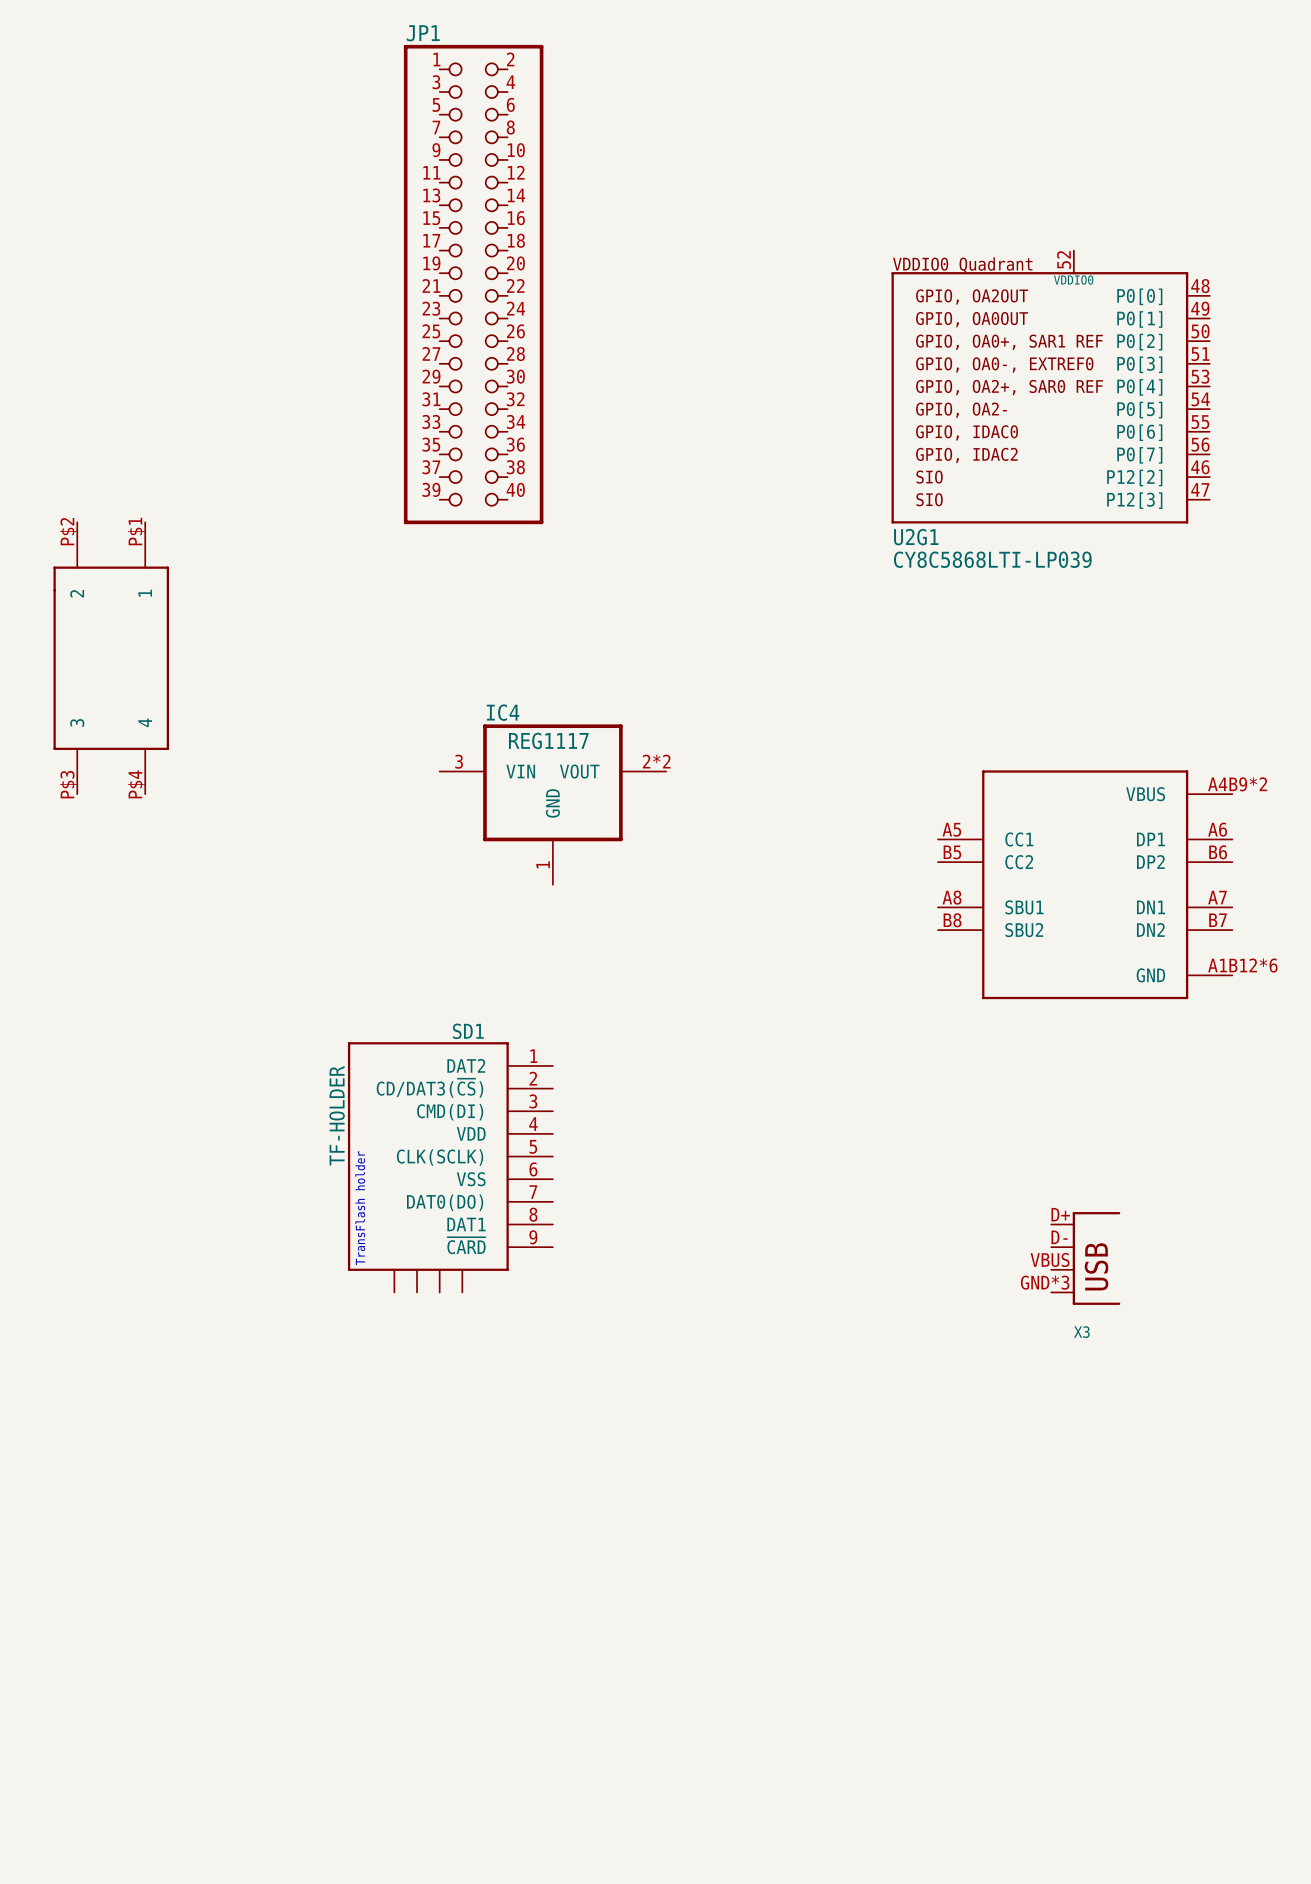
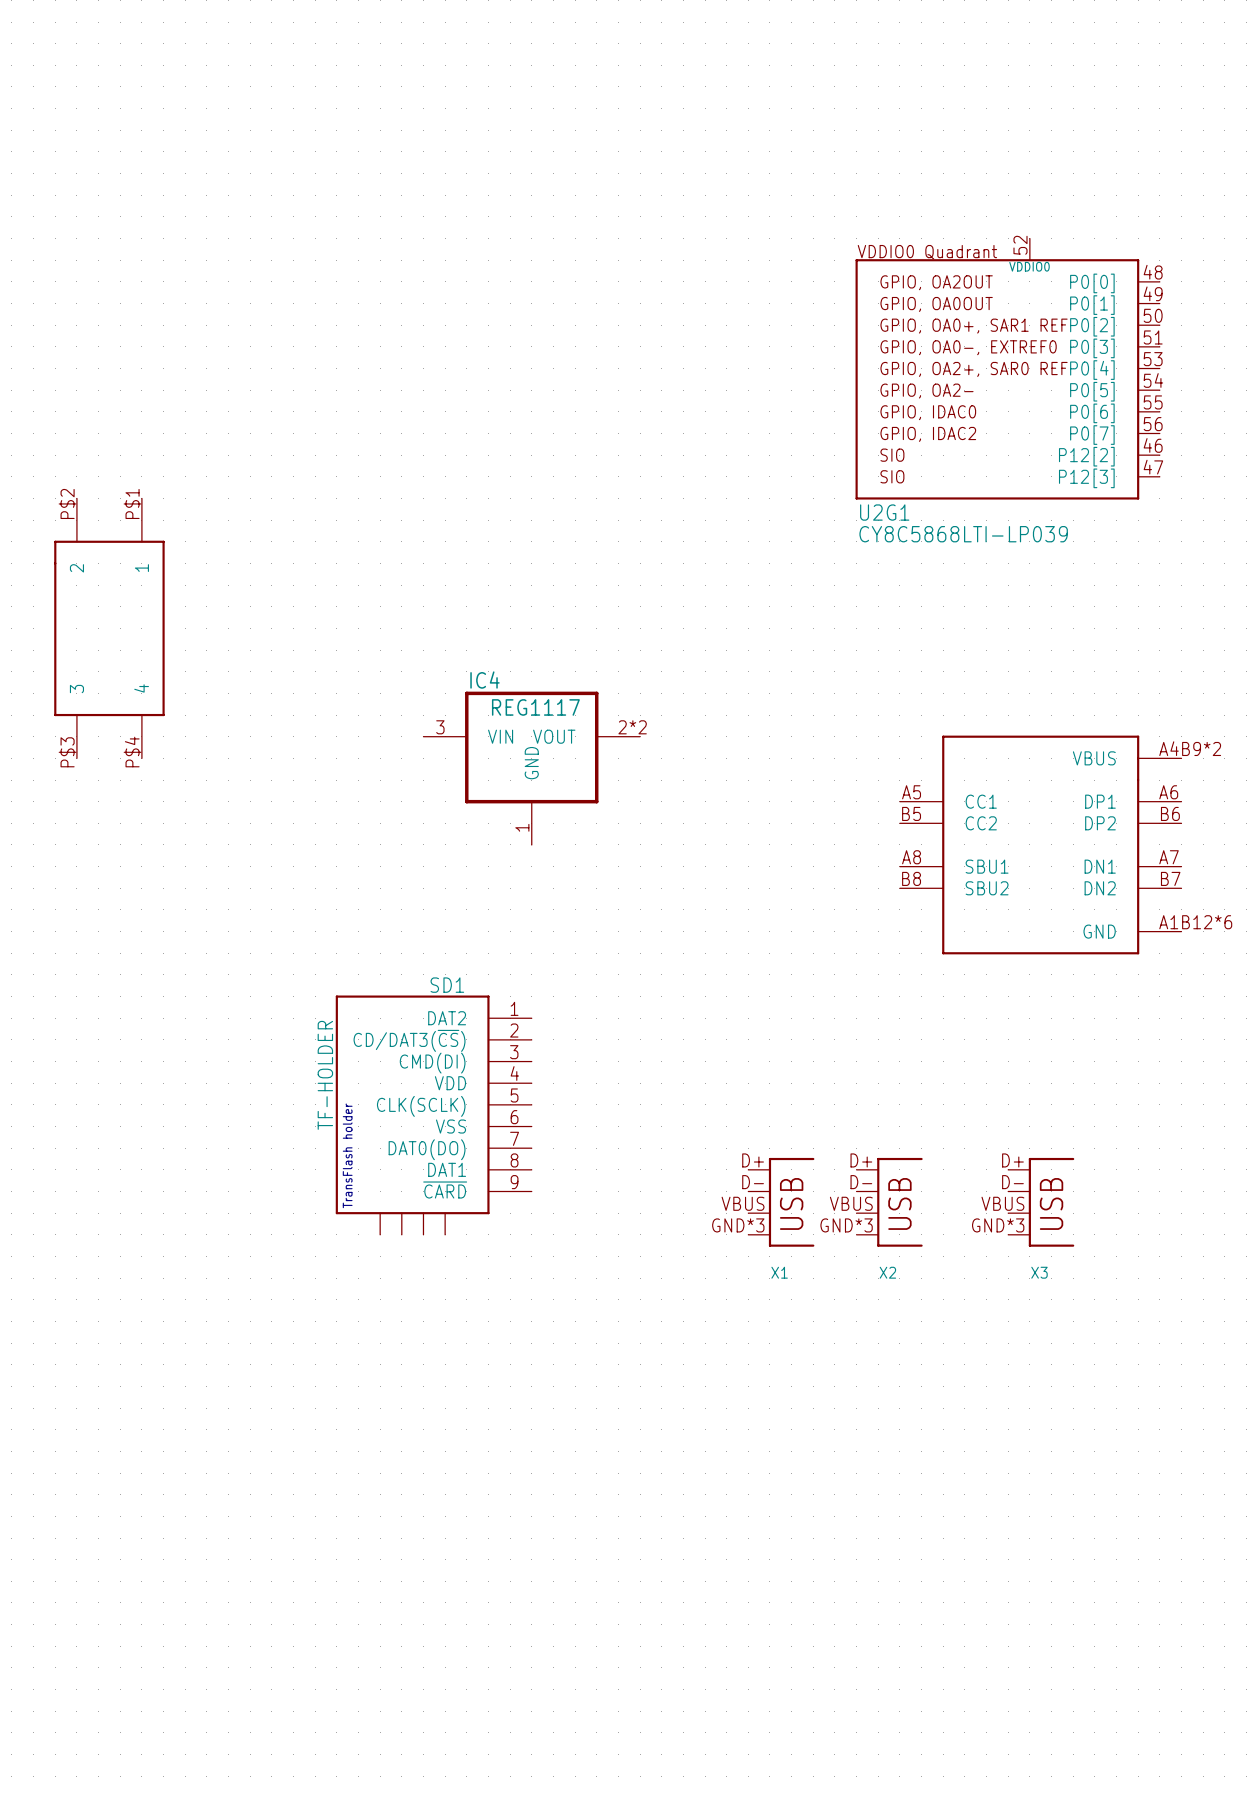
JP1: (473, 284) -> none
X1: none -> (781, 1202)
X2: none -> (889, 1202)

